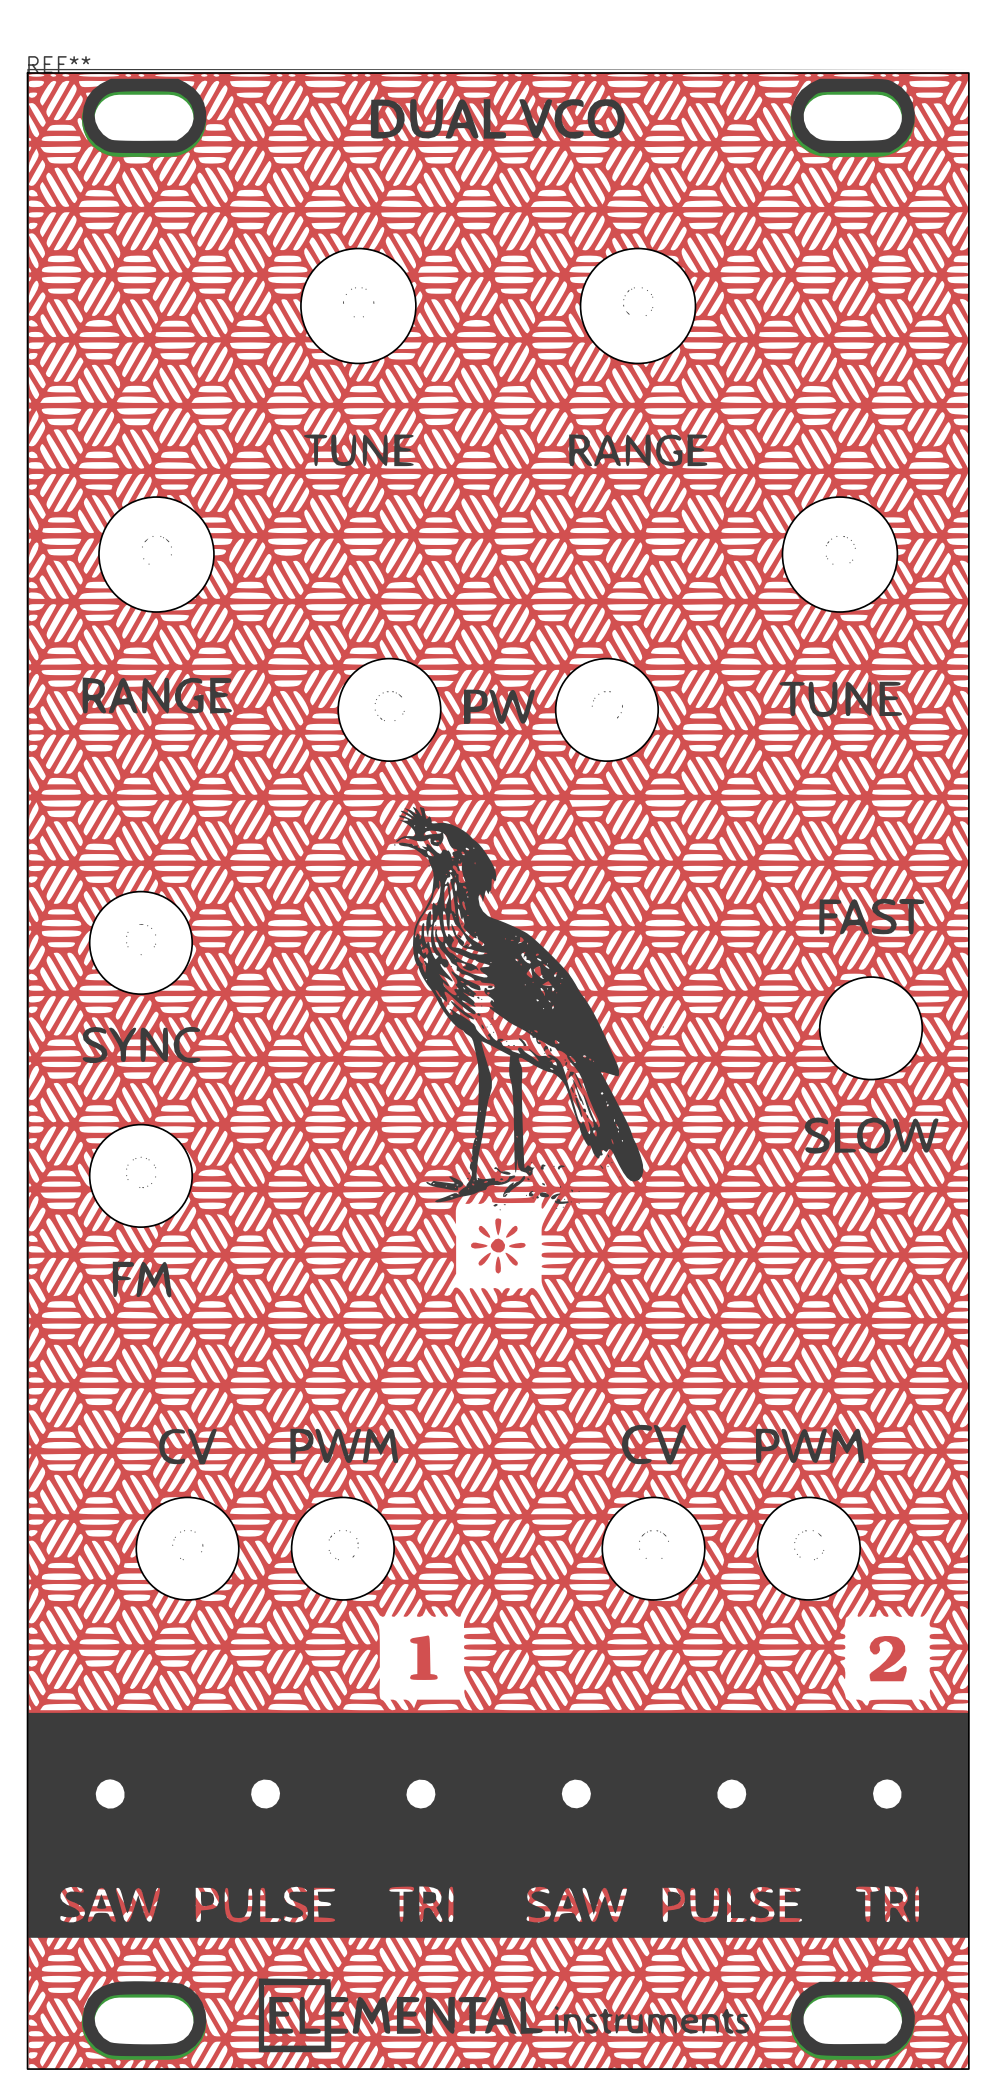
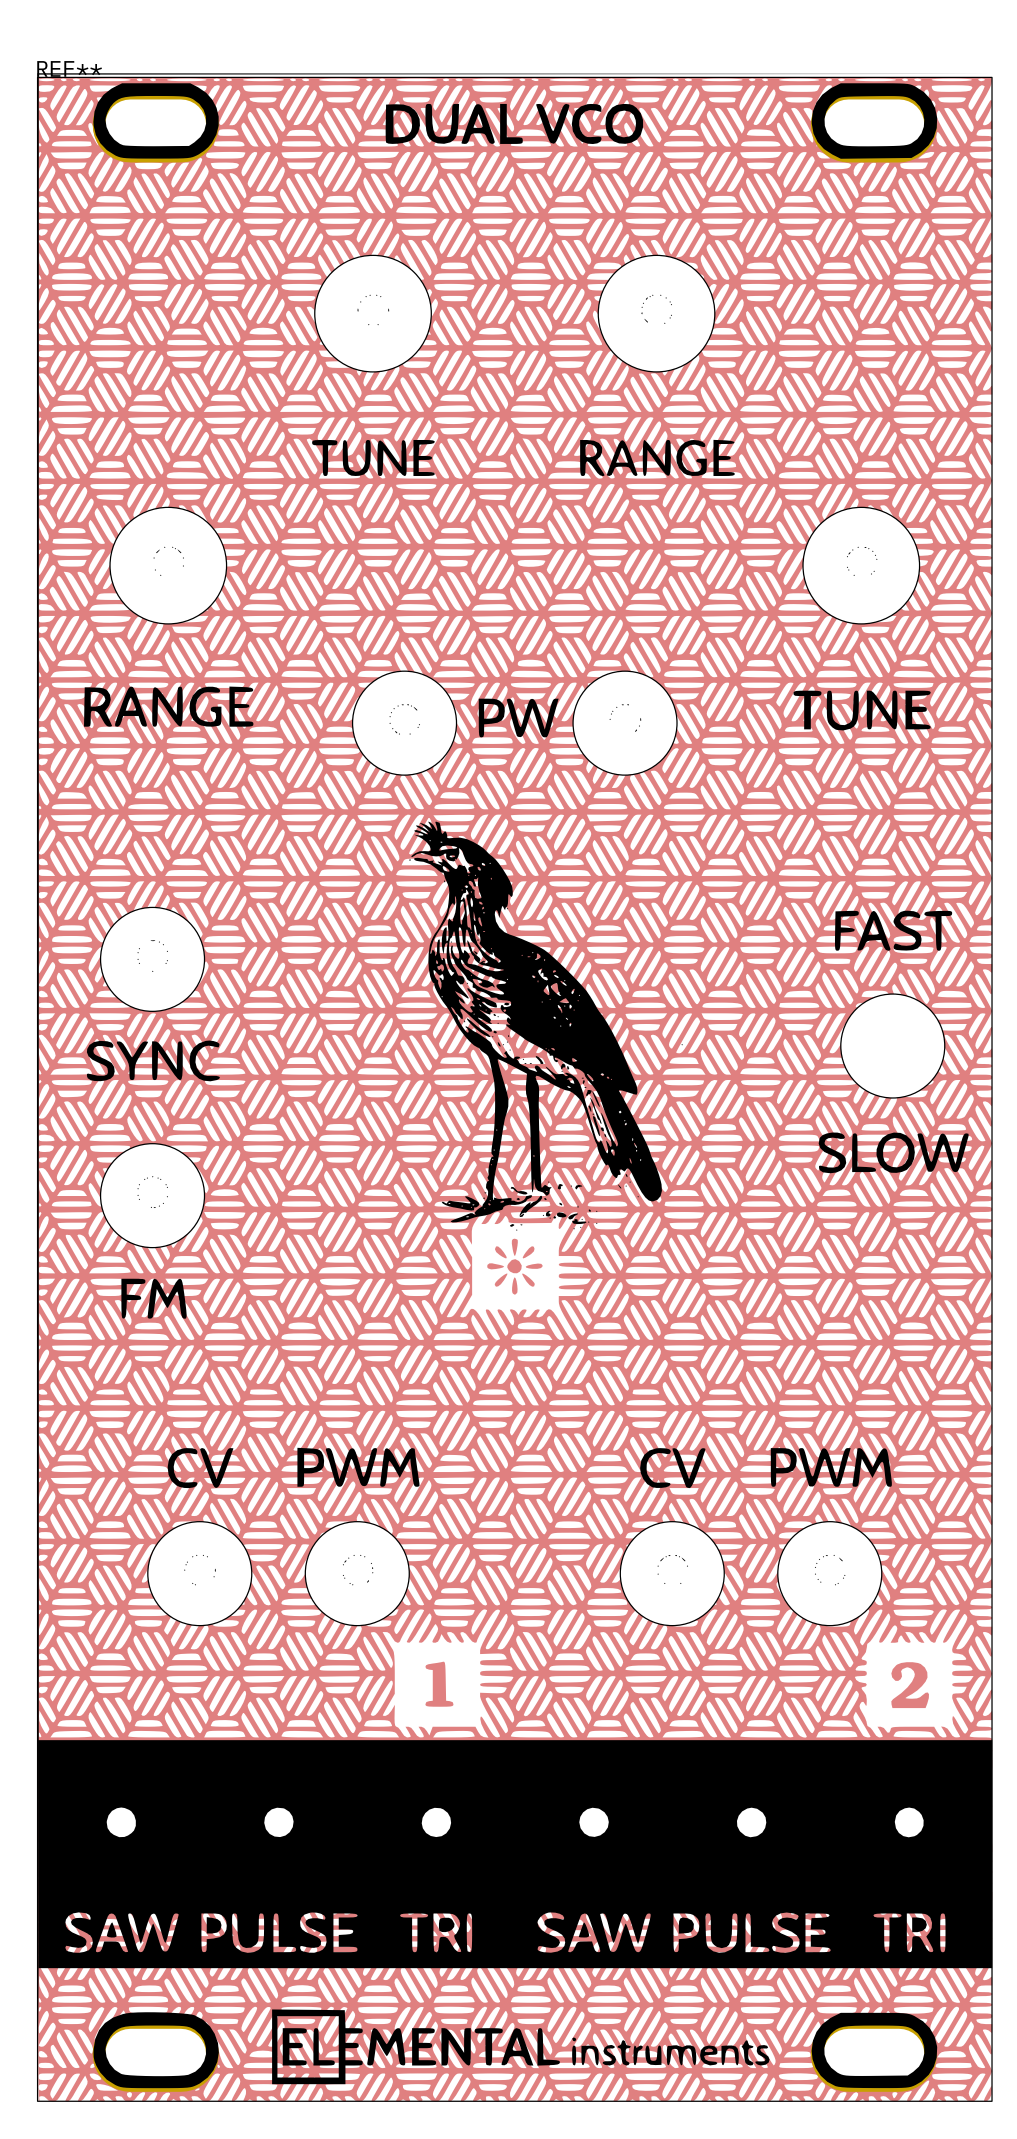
drawing shape: [27, 68, 970, 2057] -> [37, 73, 993, 2089]

